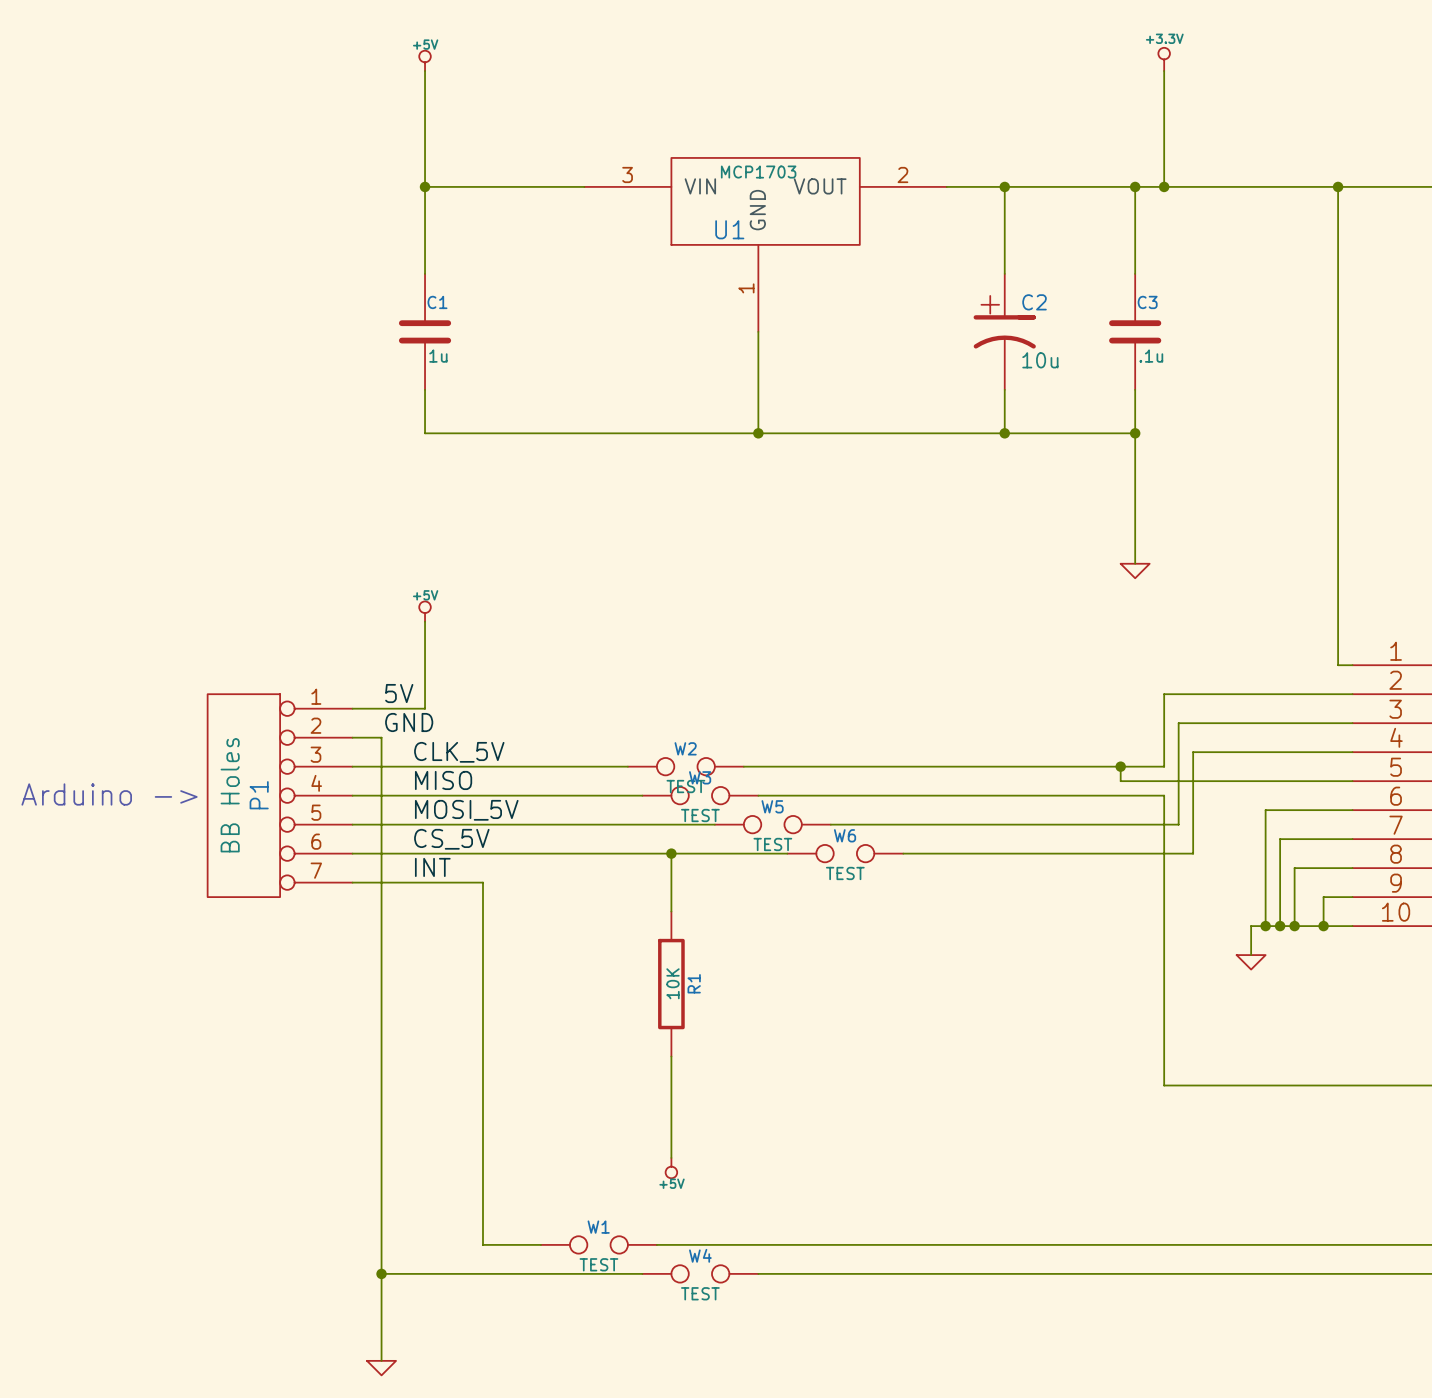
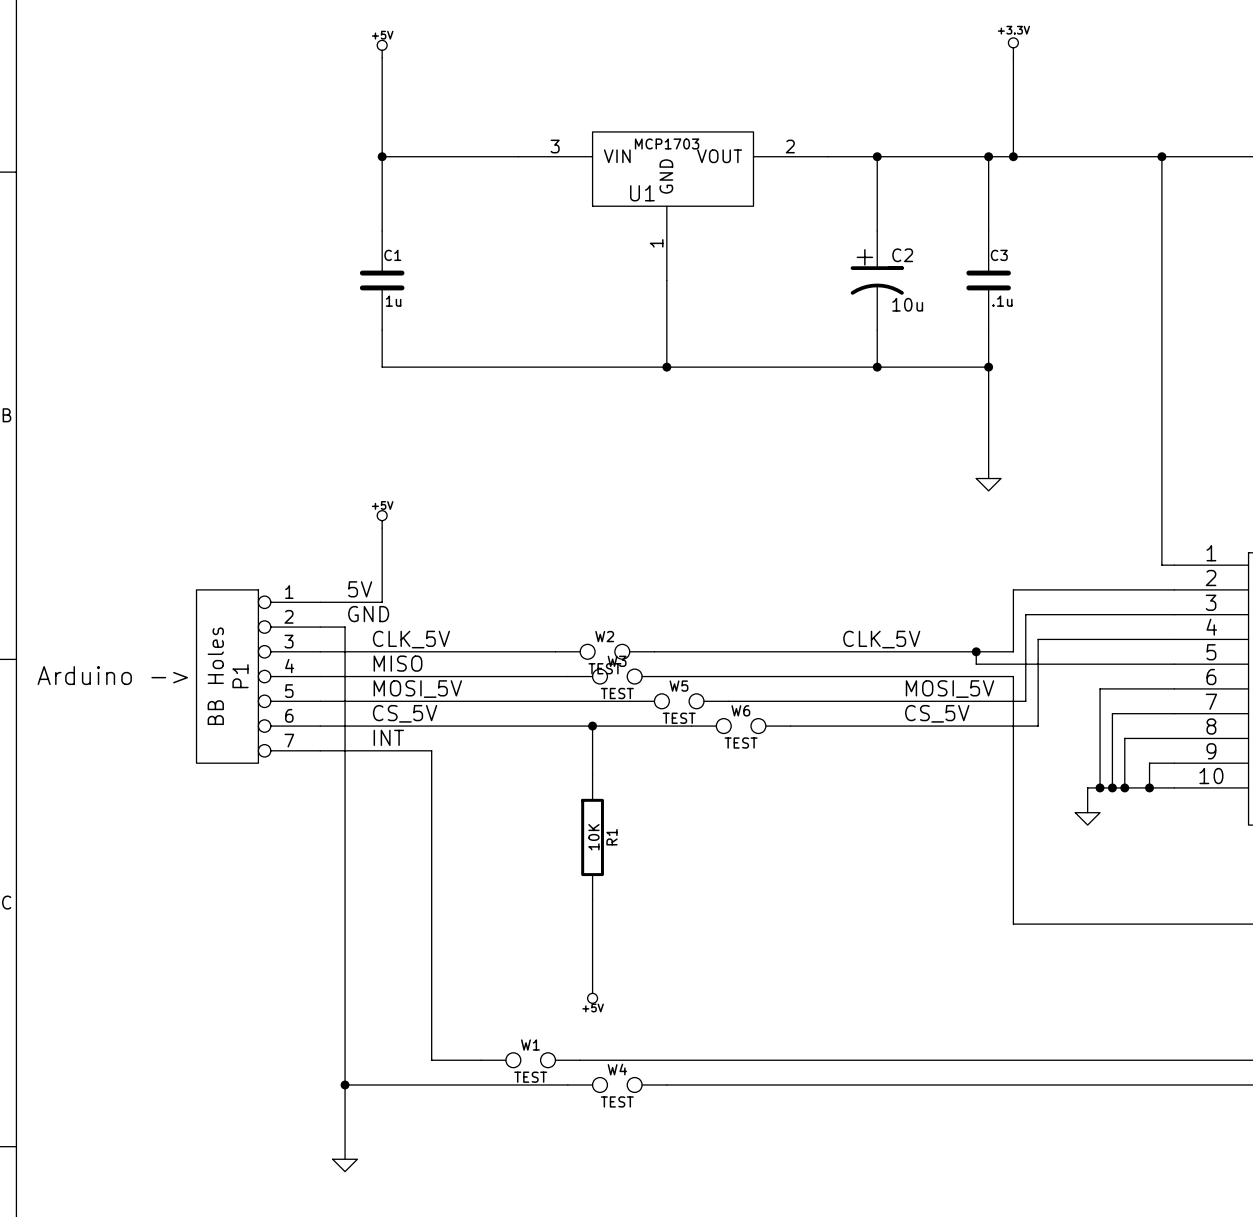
label: none -> CLK_5V (881, 639)
label: none -> MOSI_5V (950, 689)
label: none -> CS_5V (937, 713)

